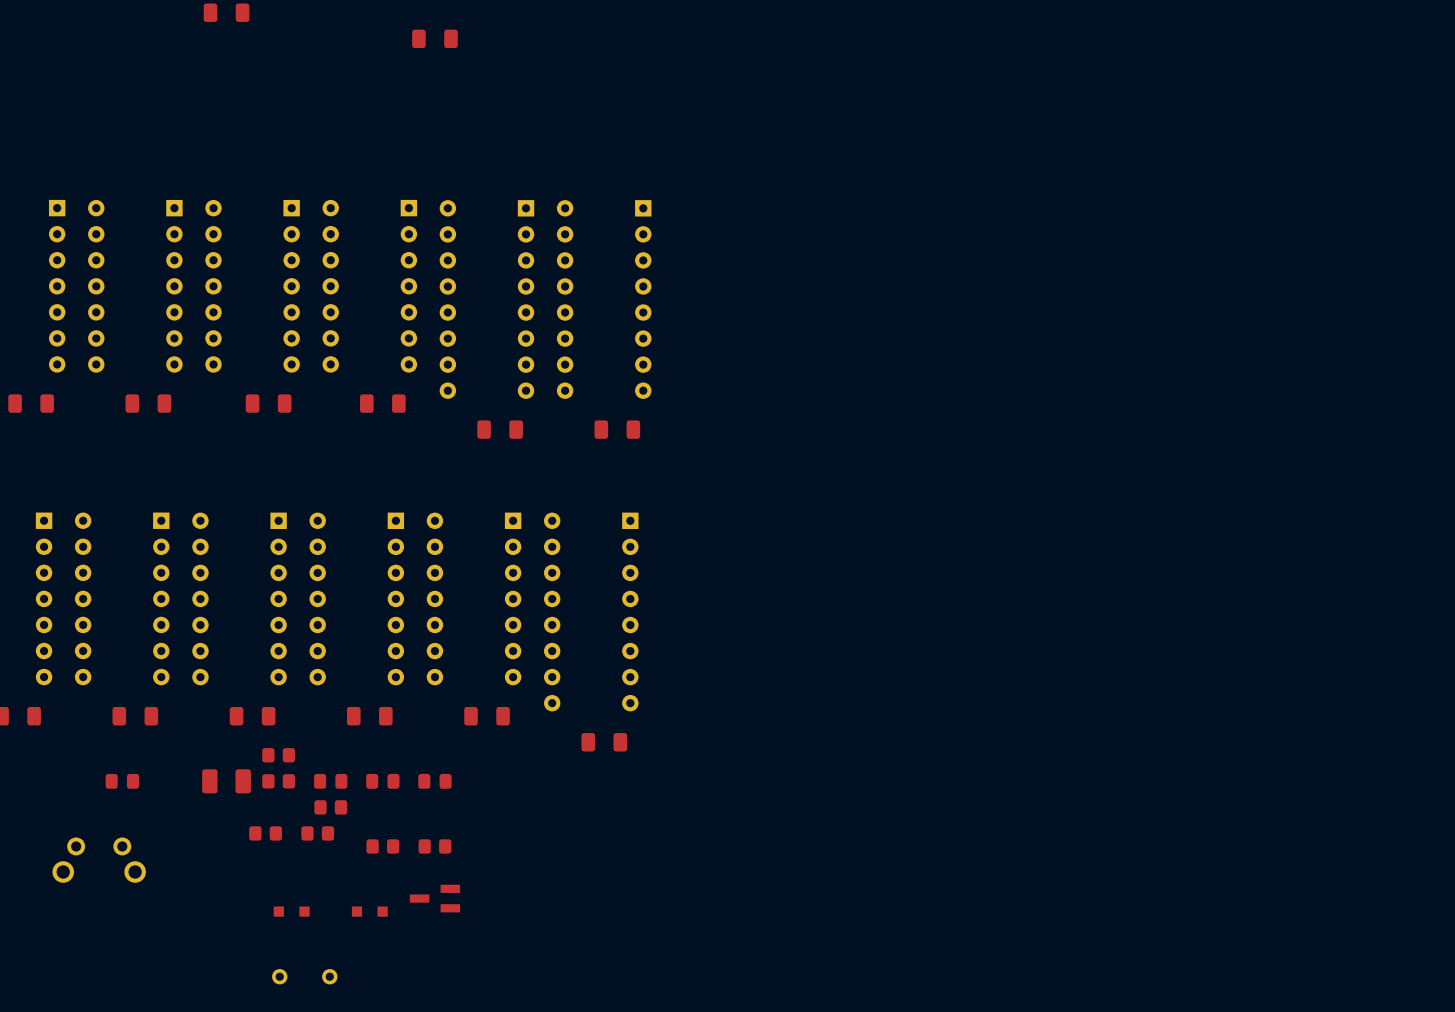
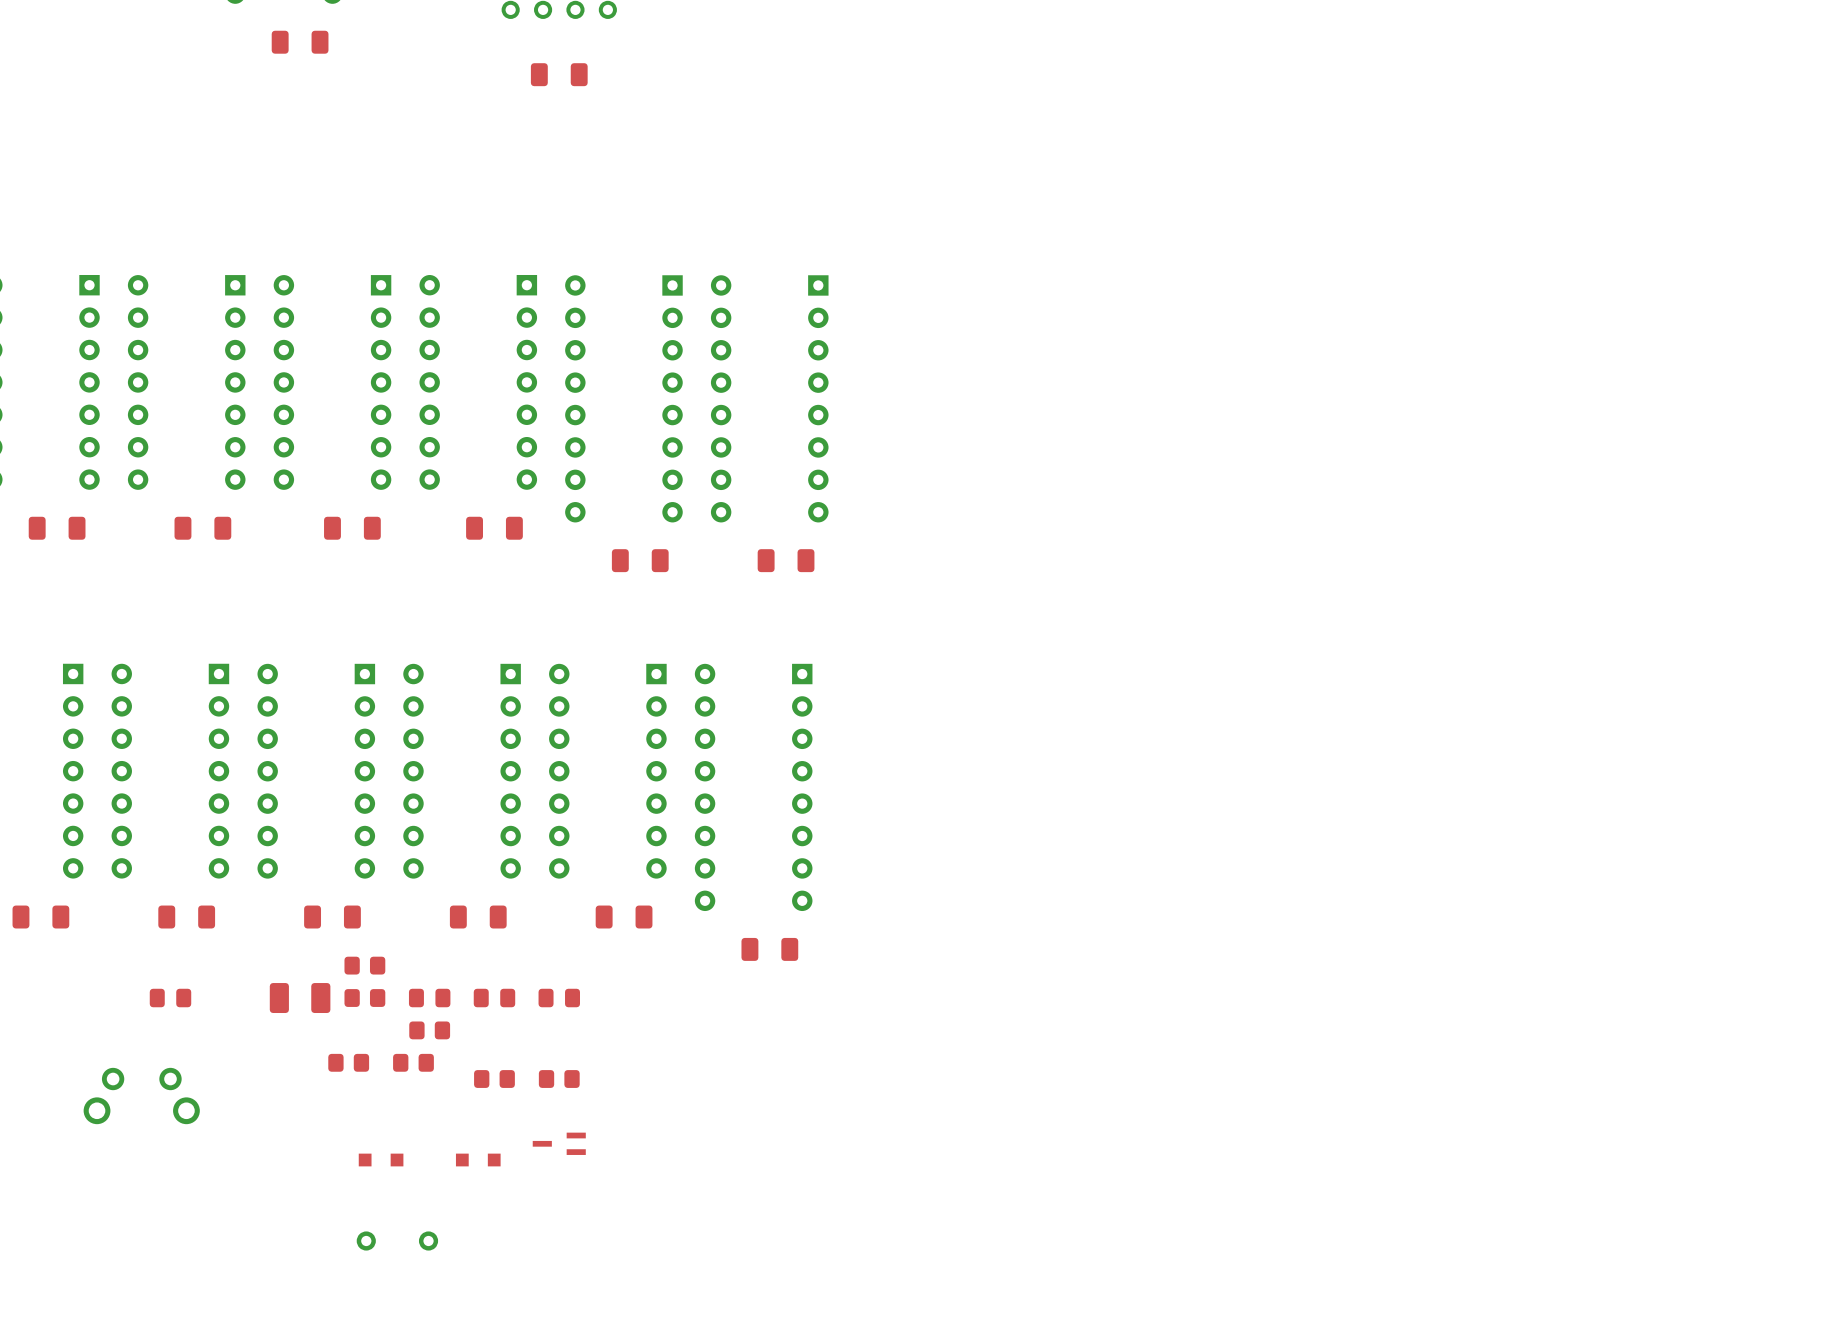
part footprint: [409, 884, 461, 913] -> [532, 1132, 586, 1155]

